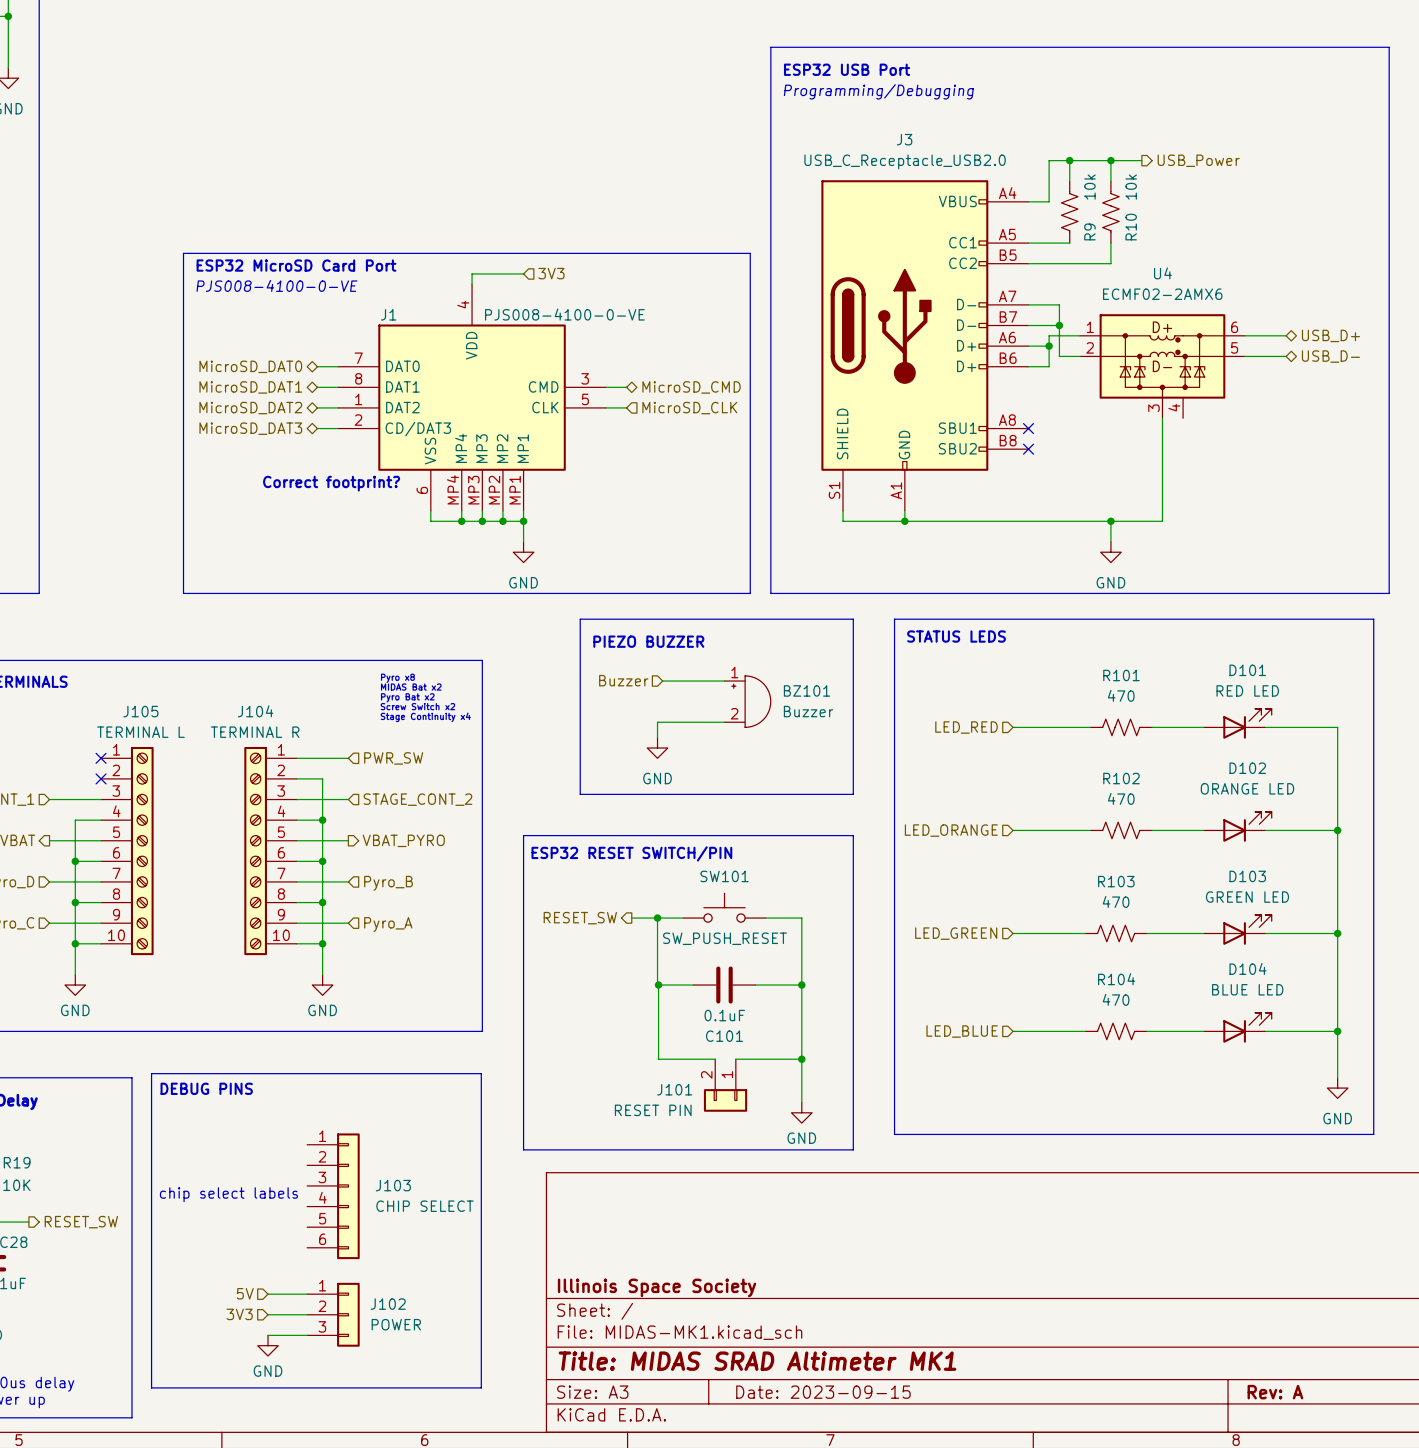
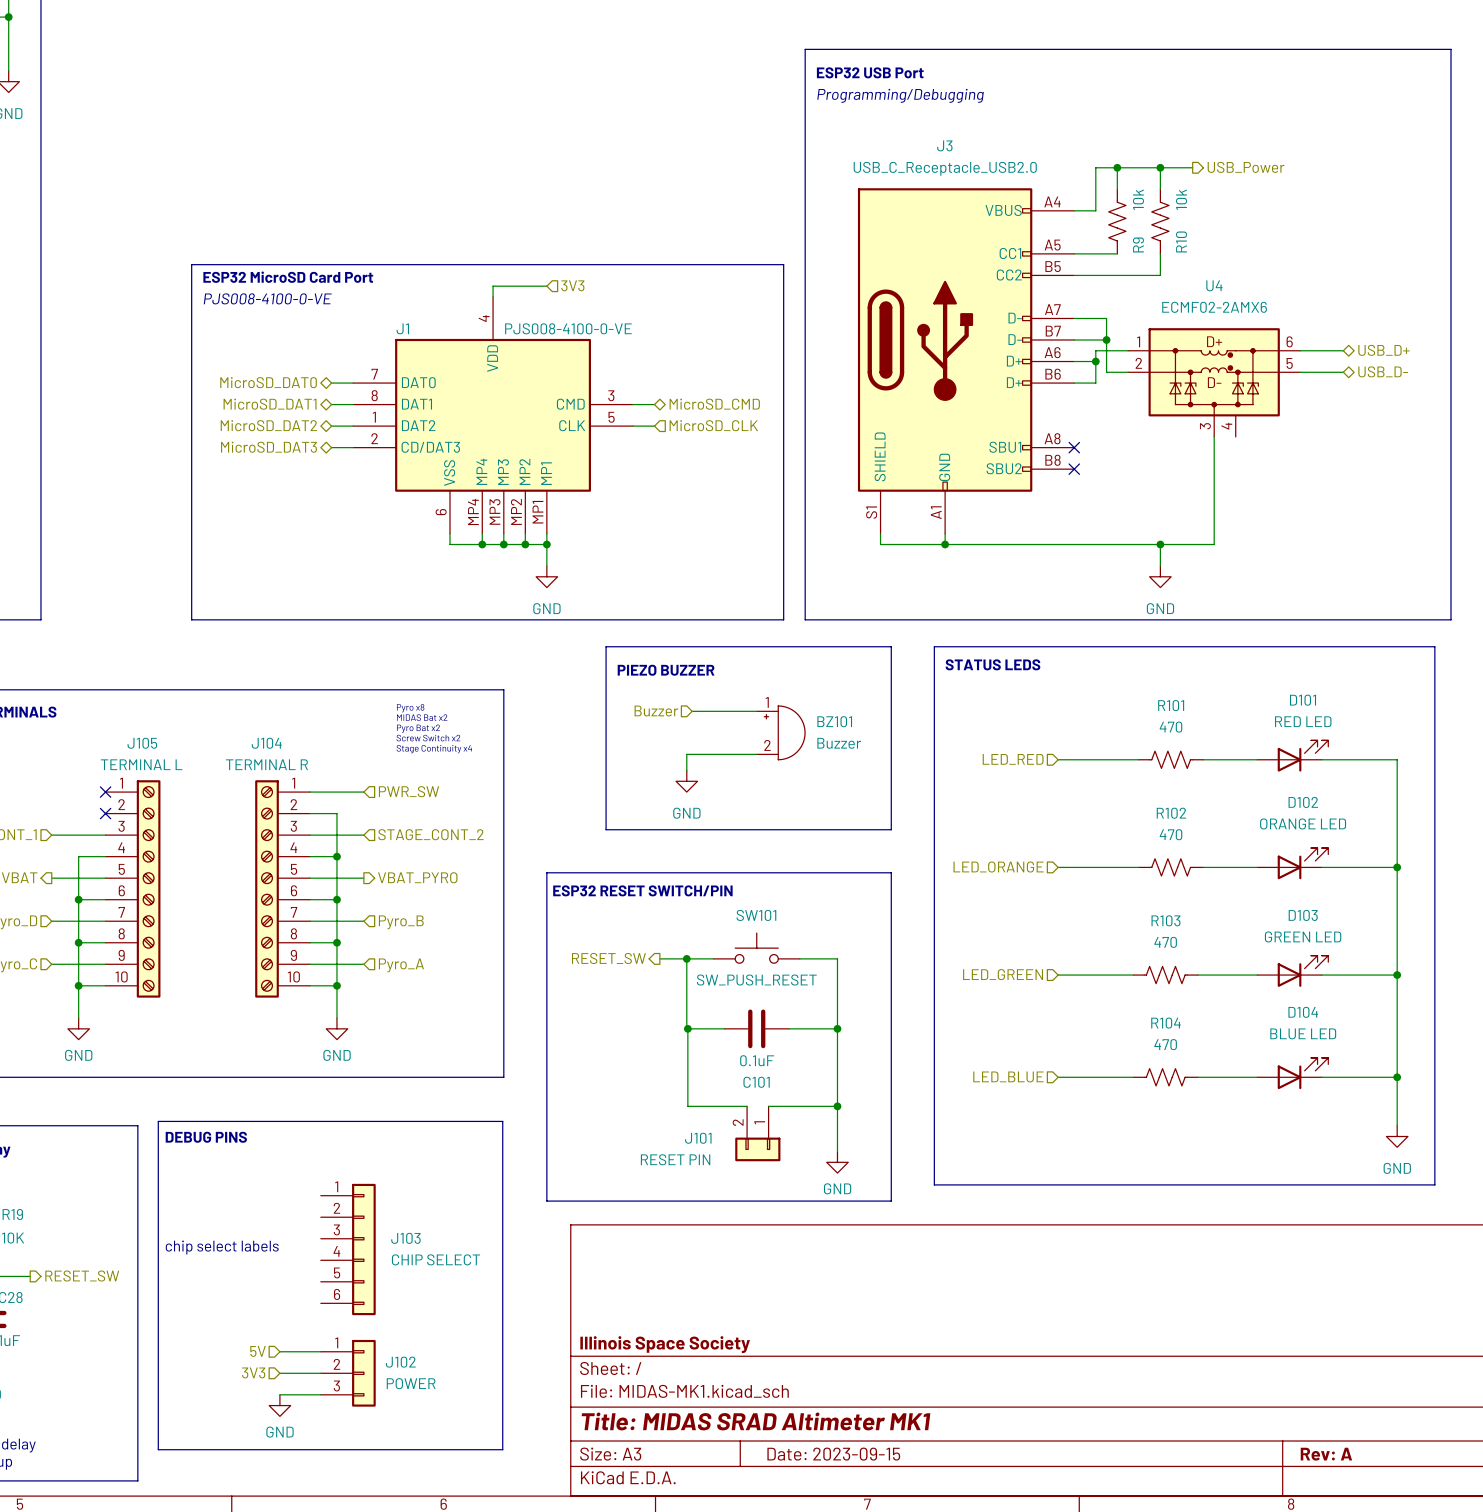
text: Correct footprint? (331, 483) -> none

